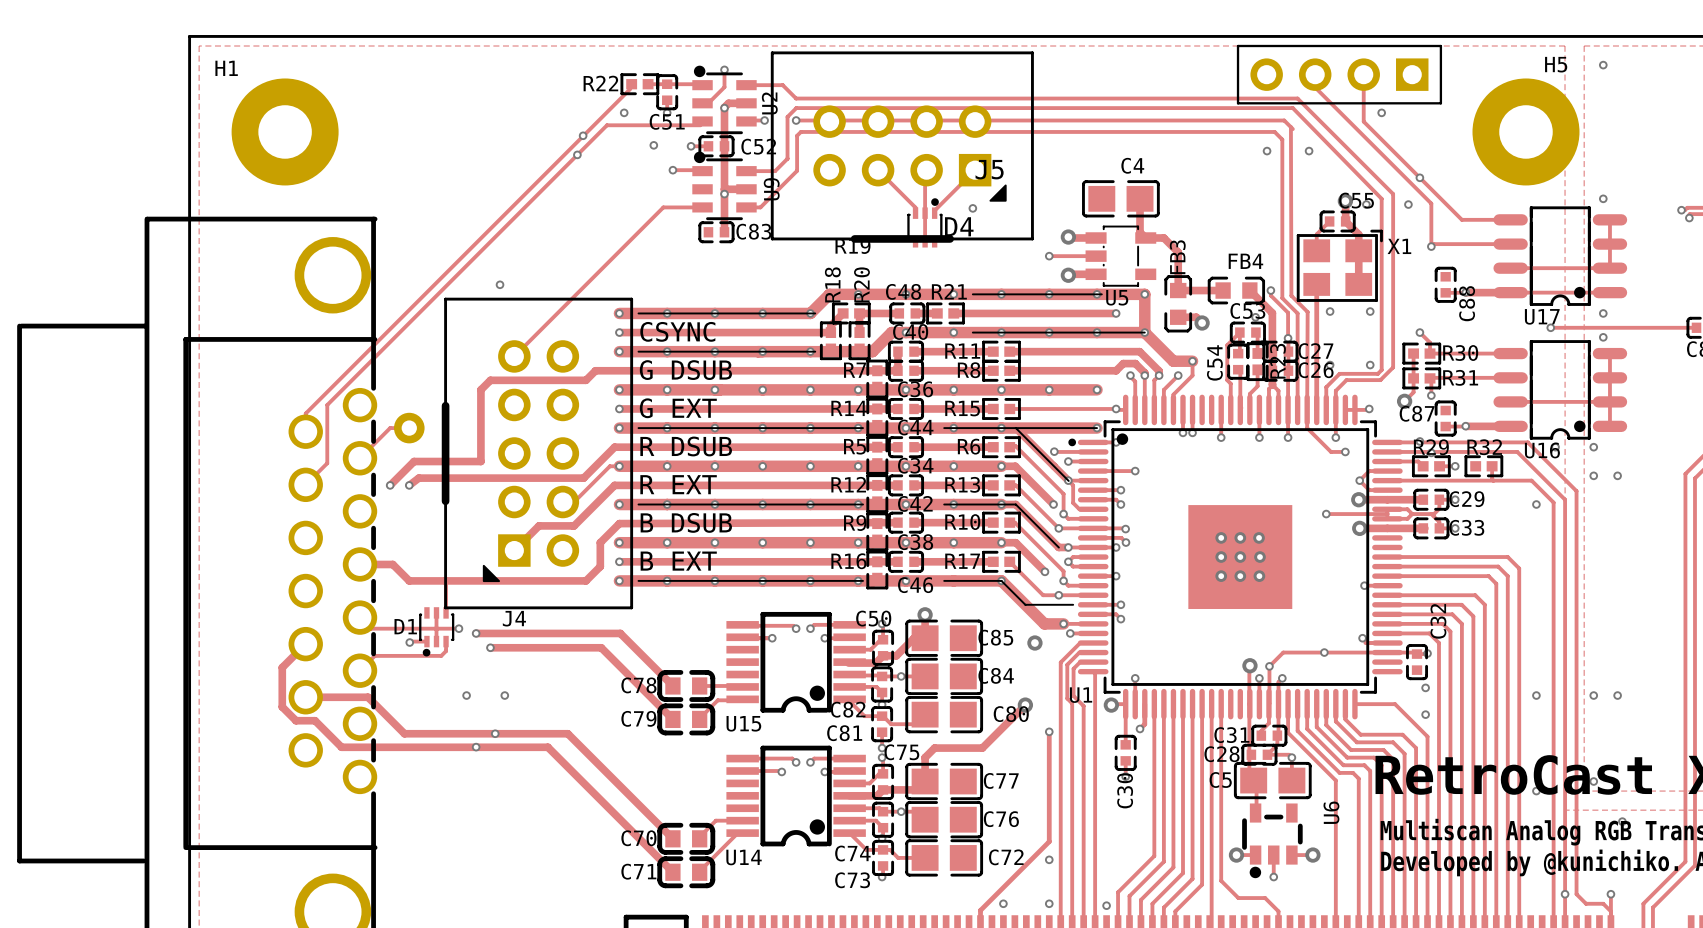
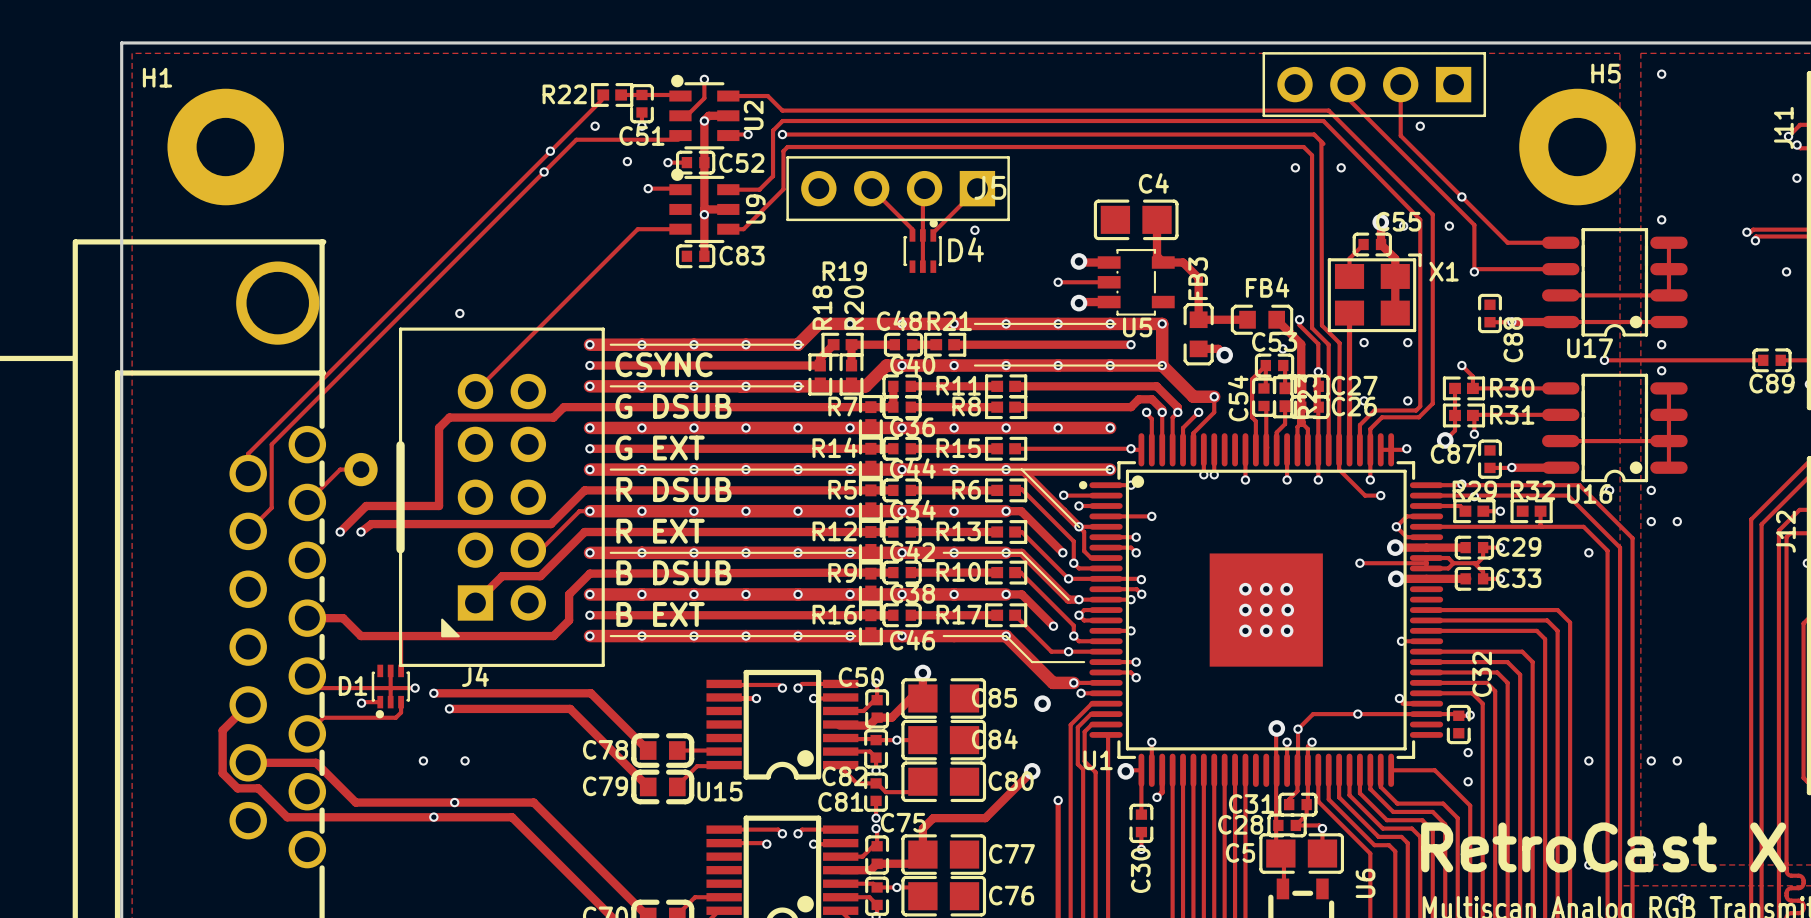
J5 footprint: [770, 51, 1034, 243] -> [786, 156, 1010, 222]

